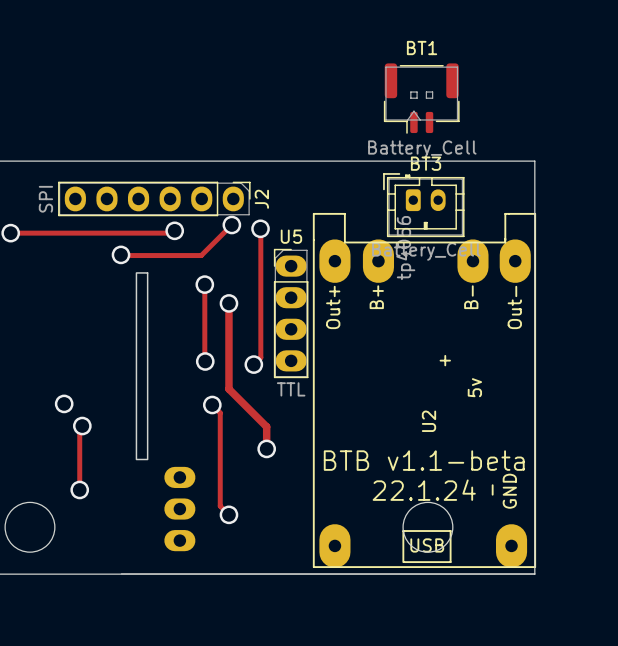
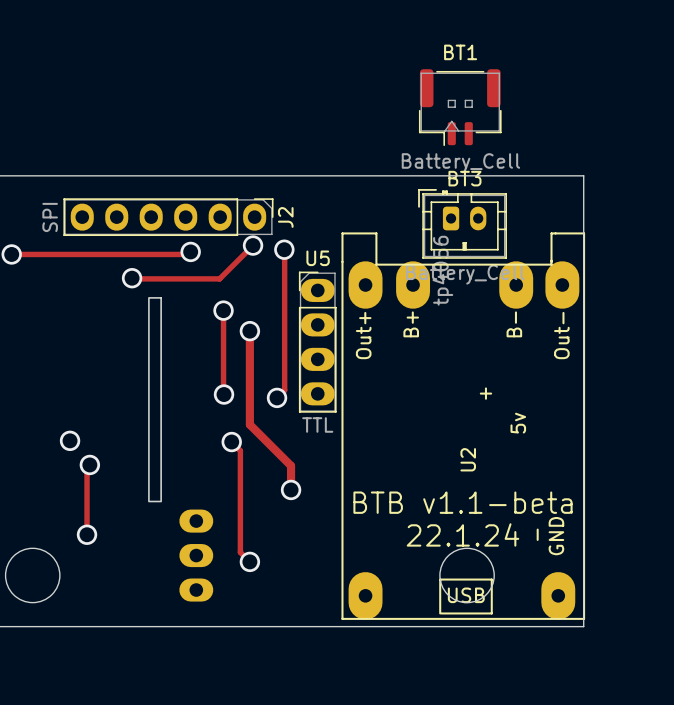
line: (121, 573) (534, 573) -> none

